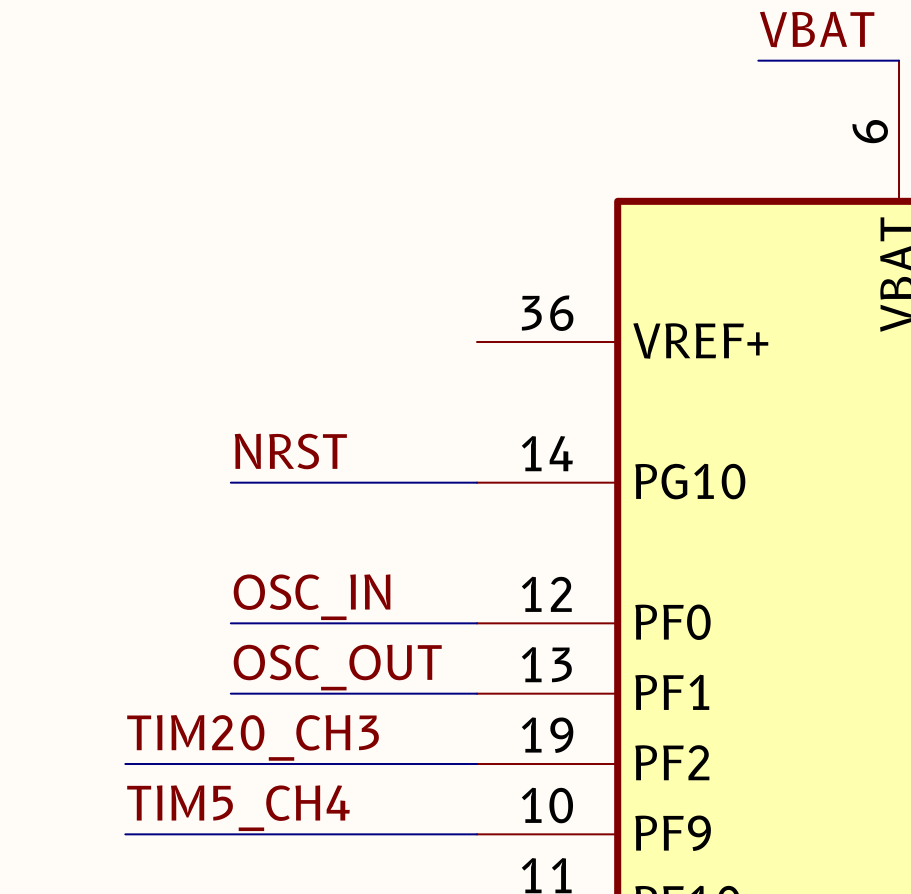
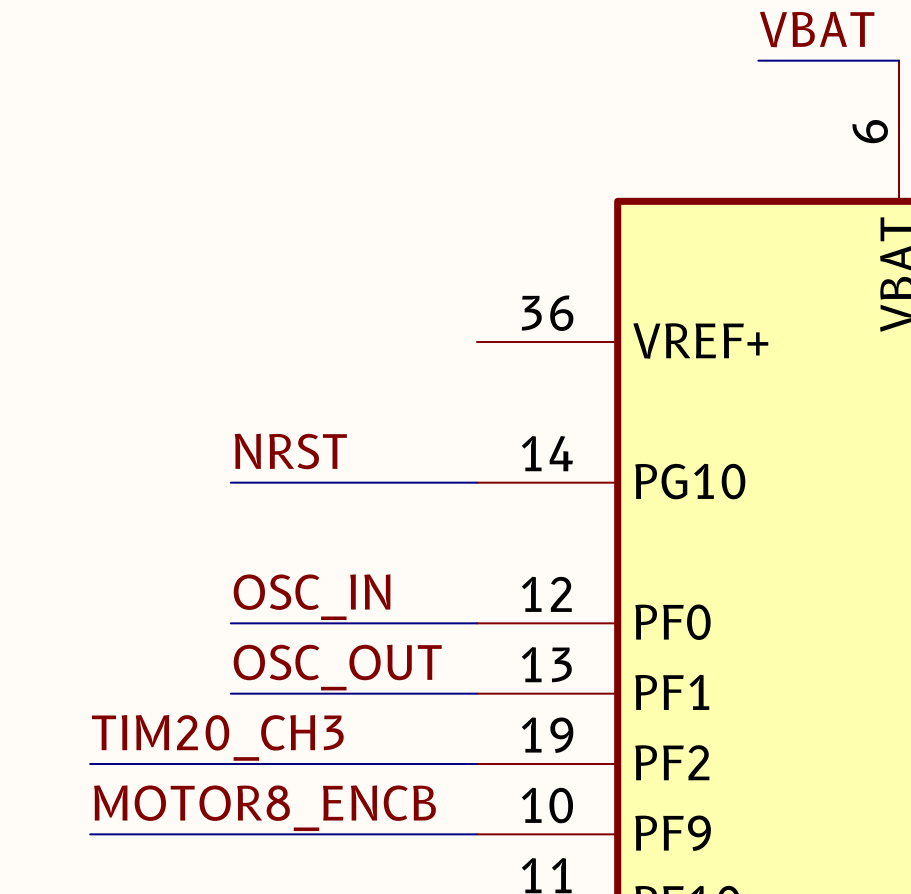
label position: TIM20_CH3 (253, 737) -> TIM20_CH3 (217, 737)
wire: none -> (90, 764) (125, 764)
label: TIM5_CH4 (238, 808) -> none
label: none -> MOTOR8_ENCB (265, 808)
wire: none -> (90, 834) (125, 834)

